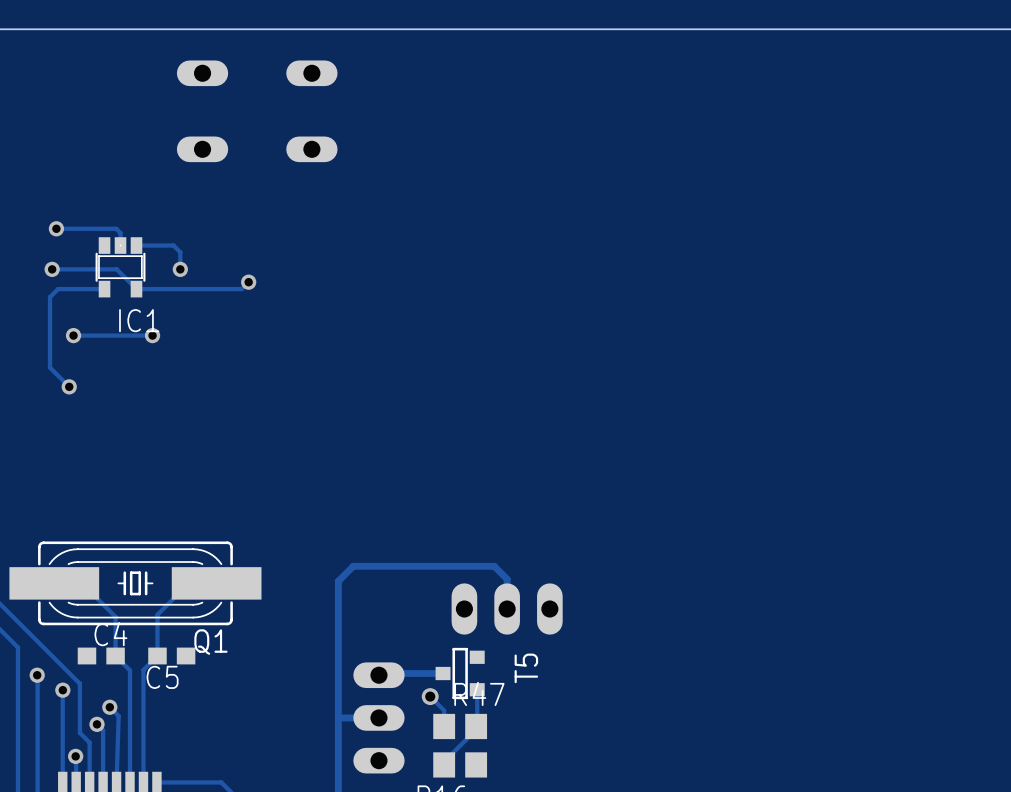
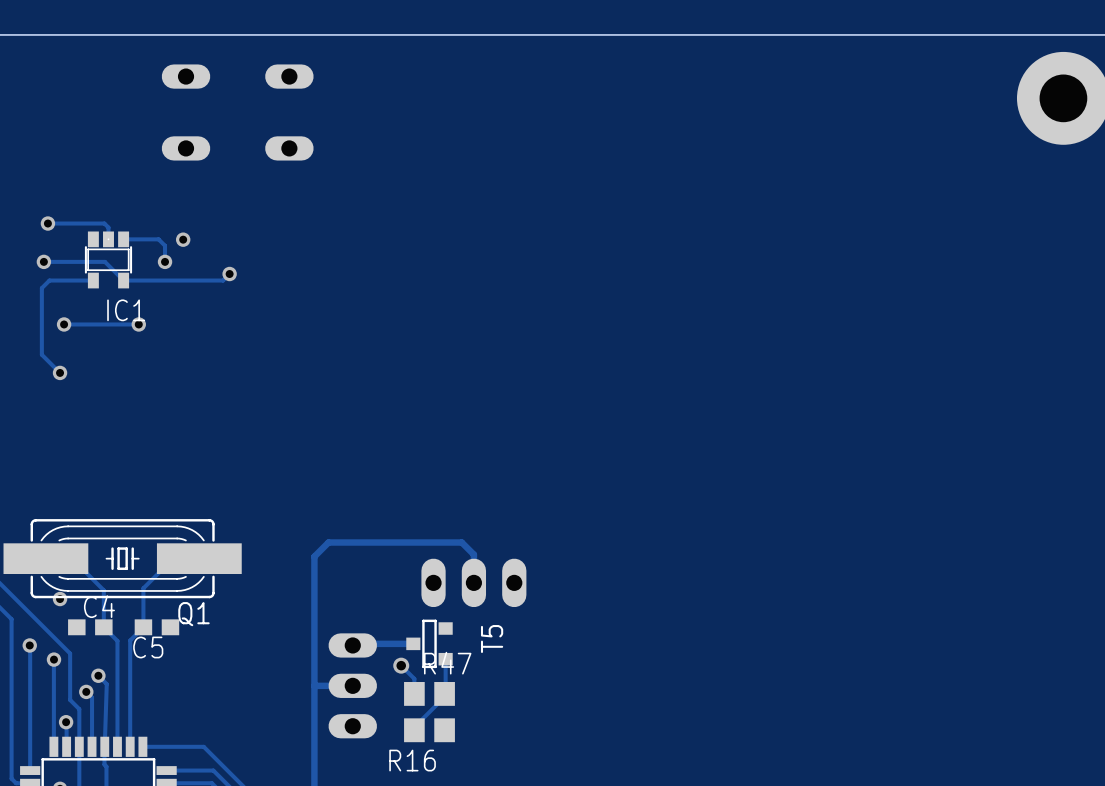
via: none -> (183, 239)
via: none -> (60, 599)

